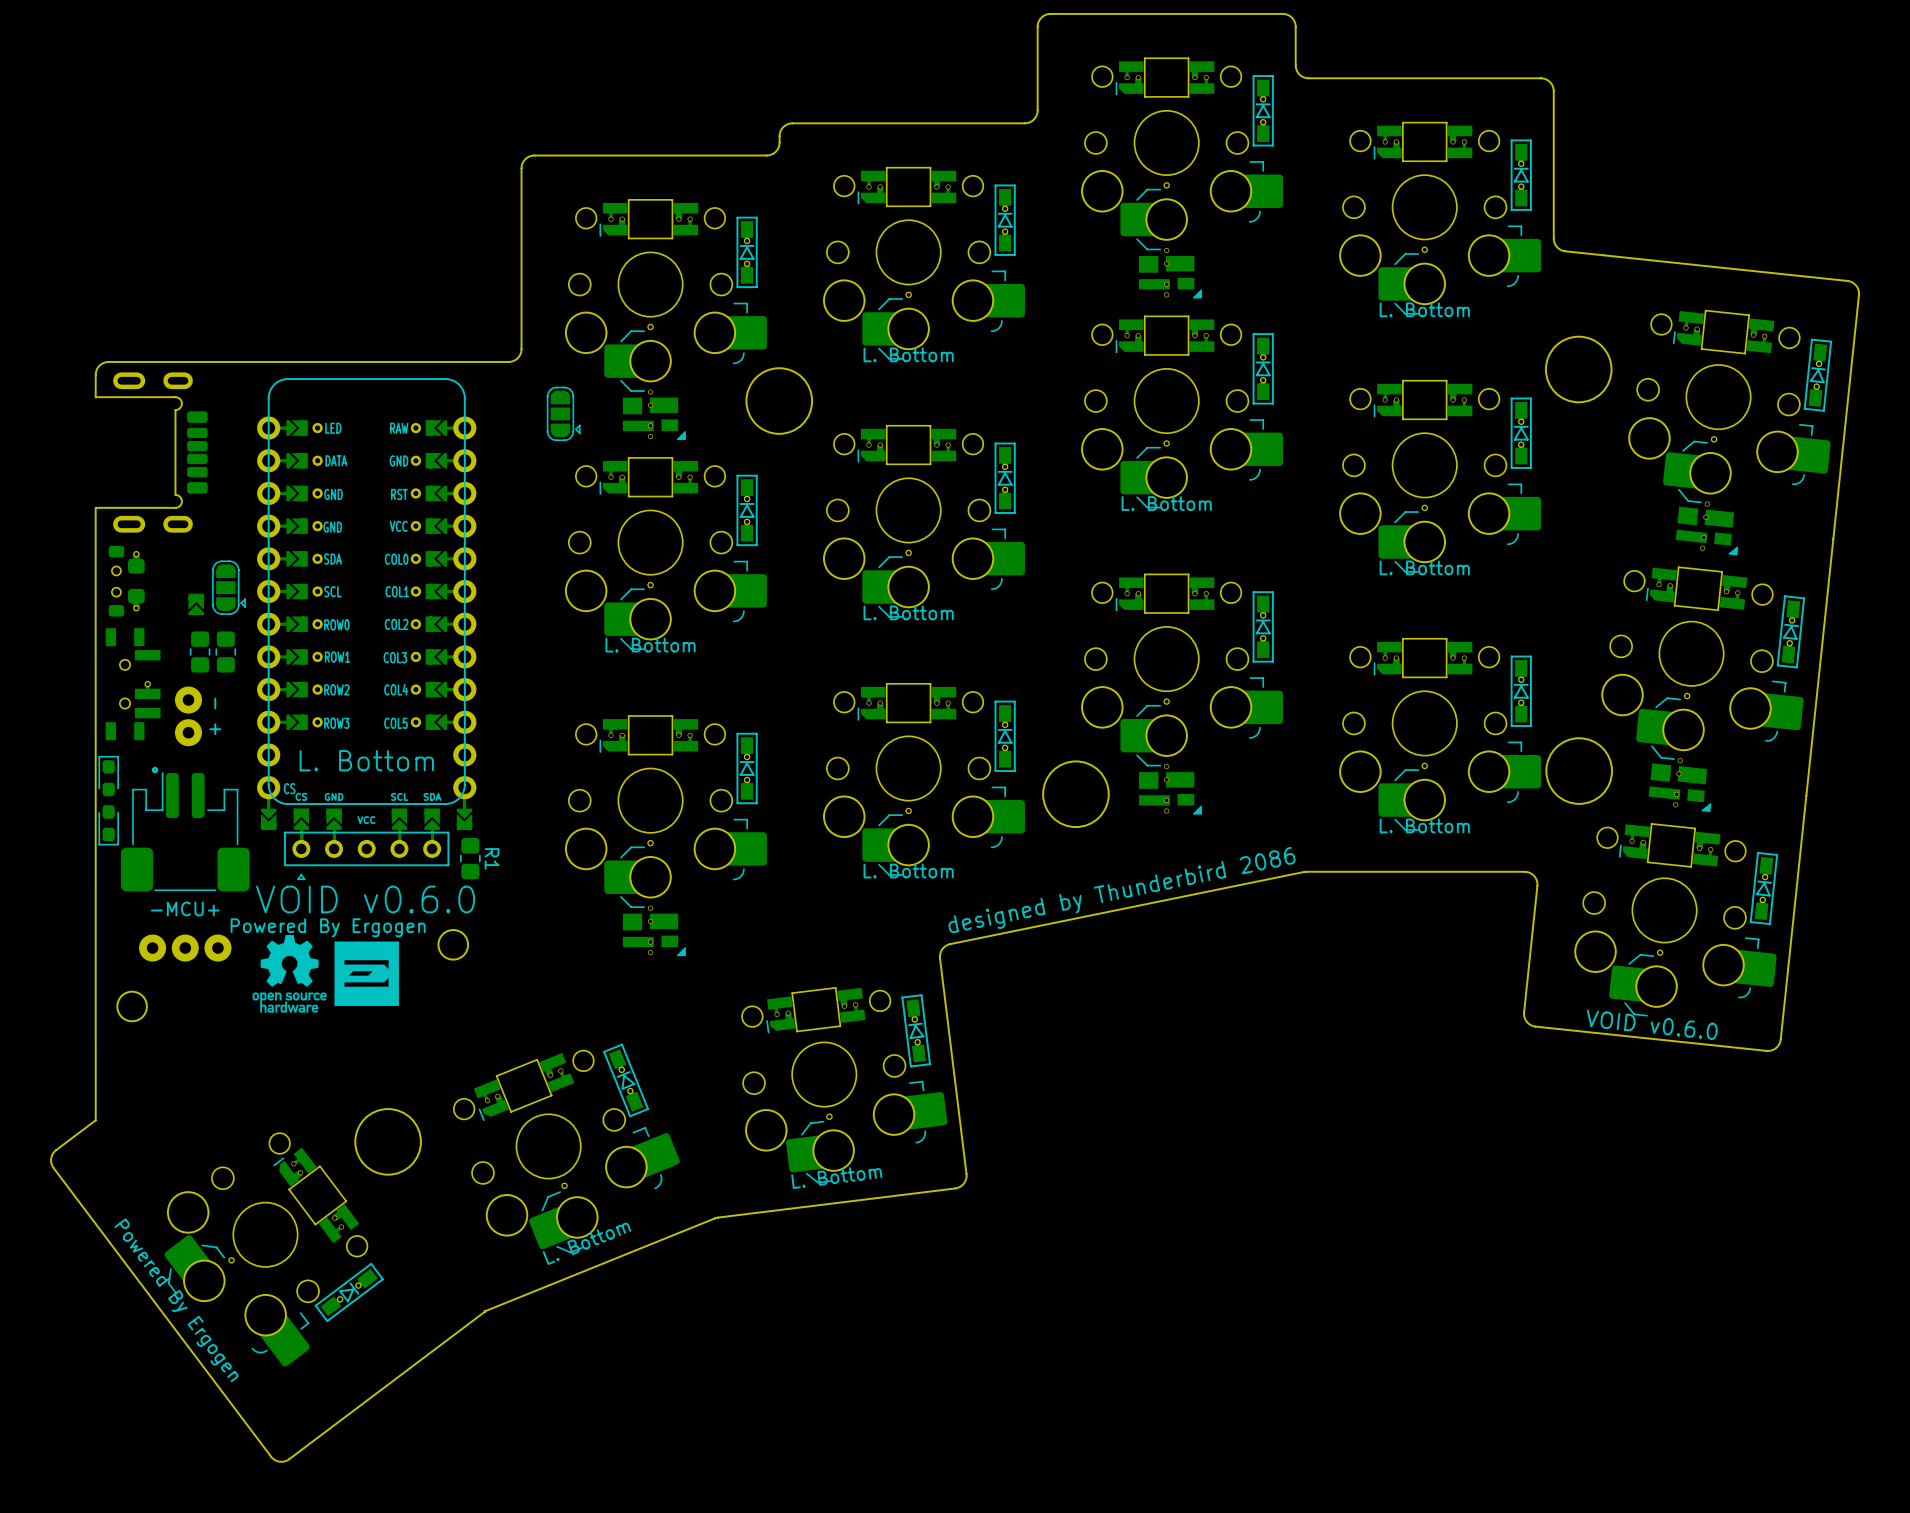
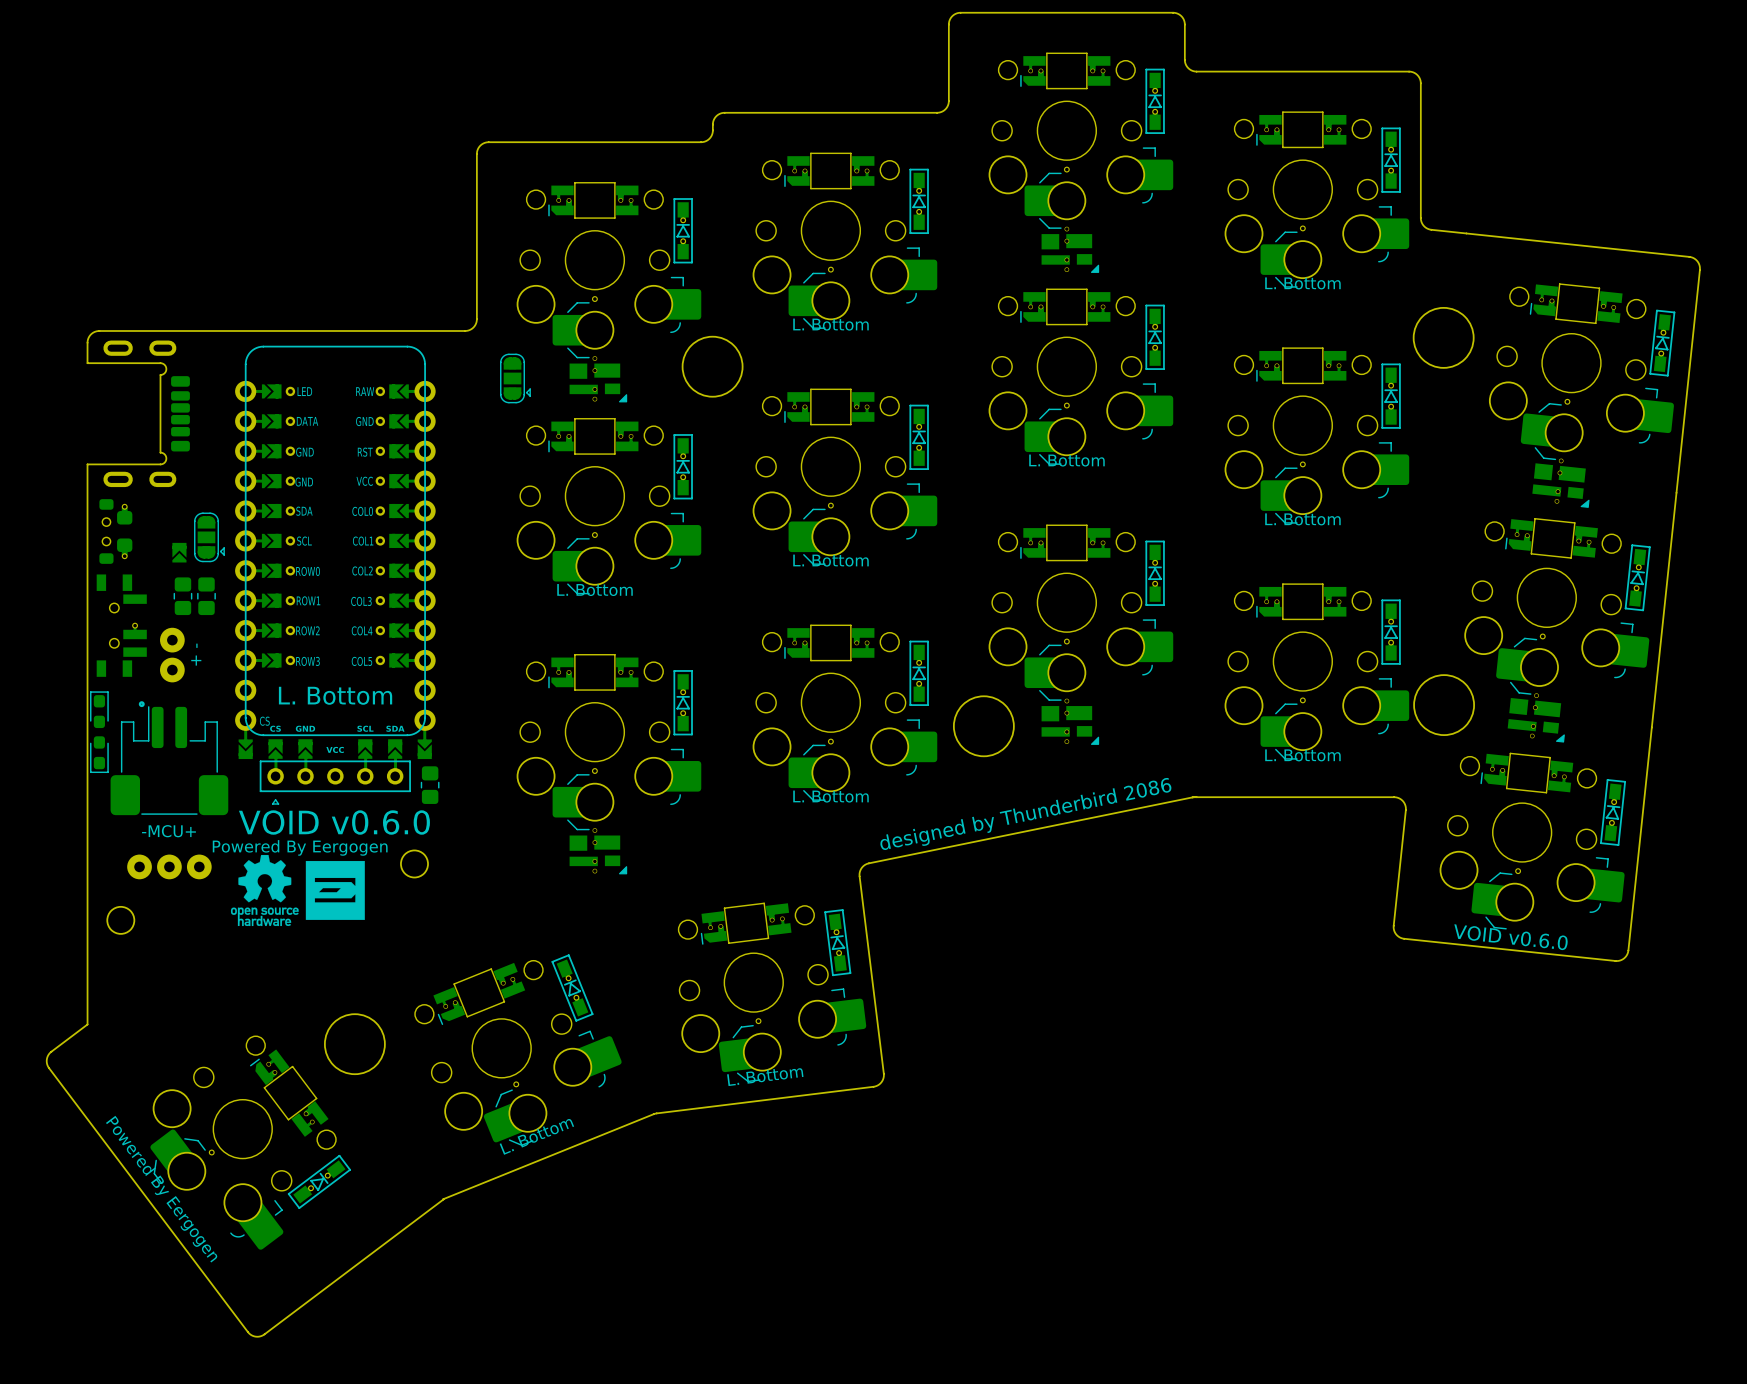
R1 name: R1 (492, 858) -> none
text: Powered By Ergogen (328, 927) -> Powered By Eergogen (300, 847)
text: Powered By Ergogen (176, 1300) -> Powered By Eergogen (161, 1189)

